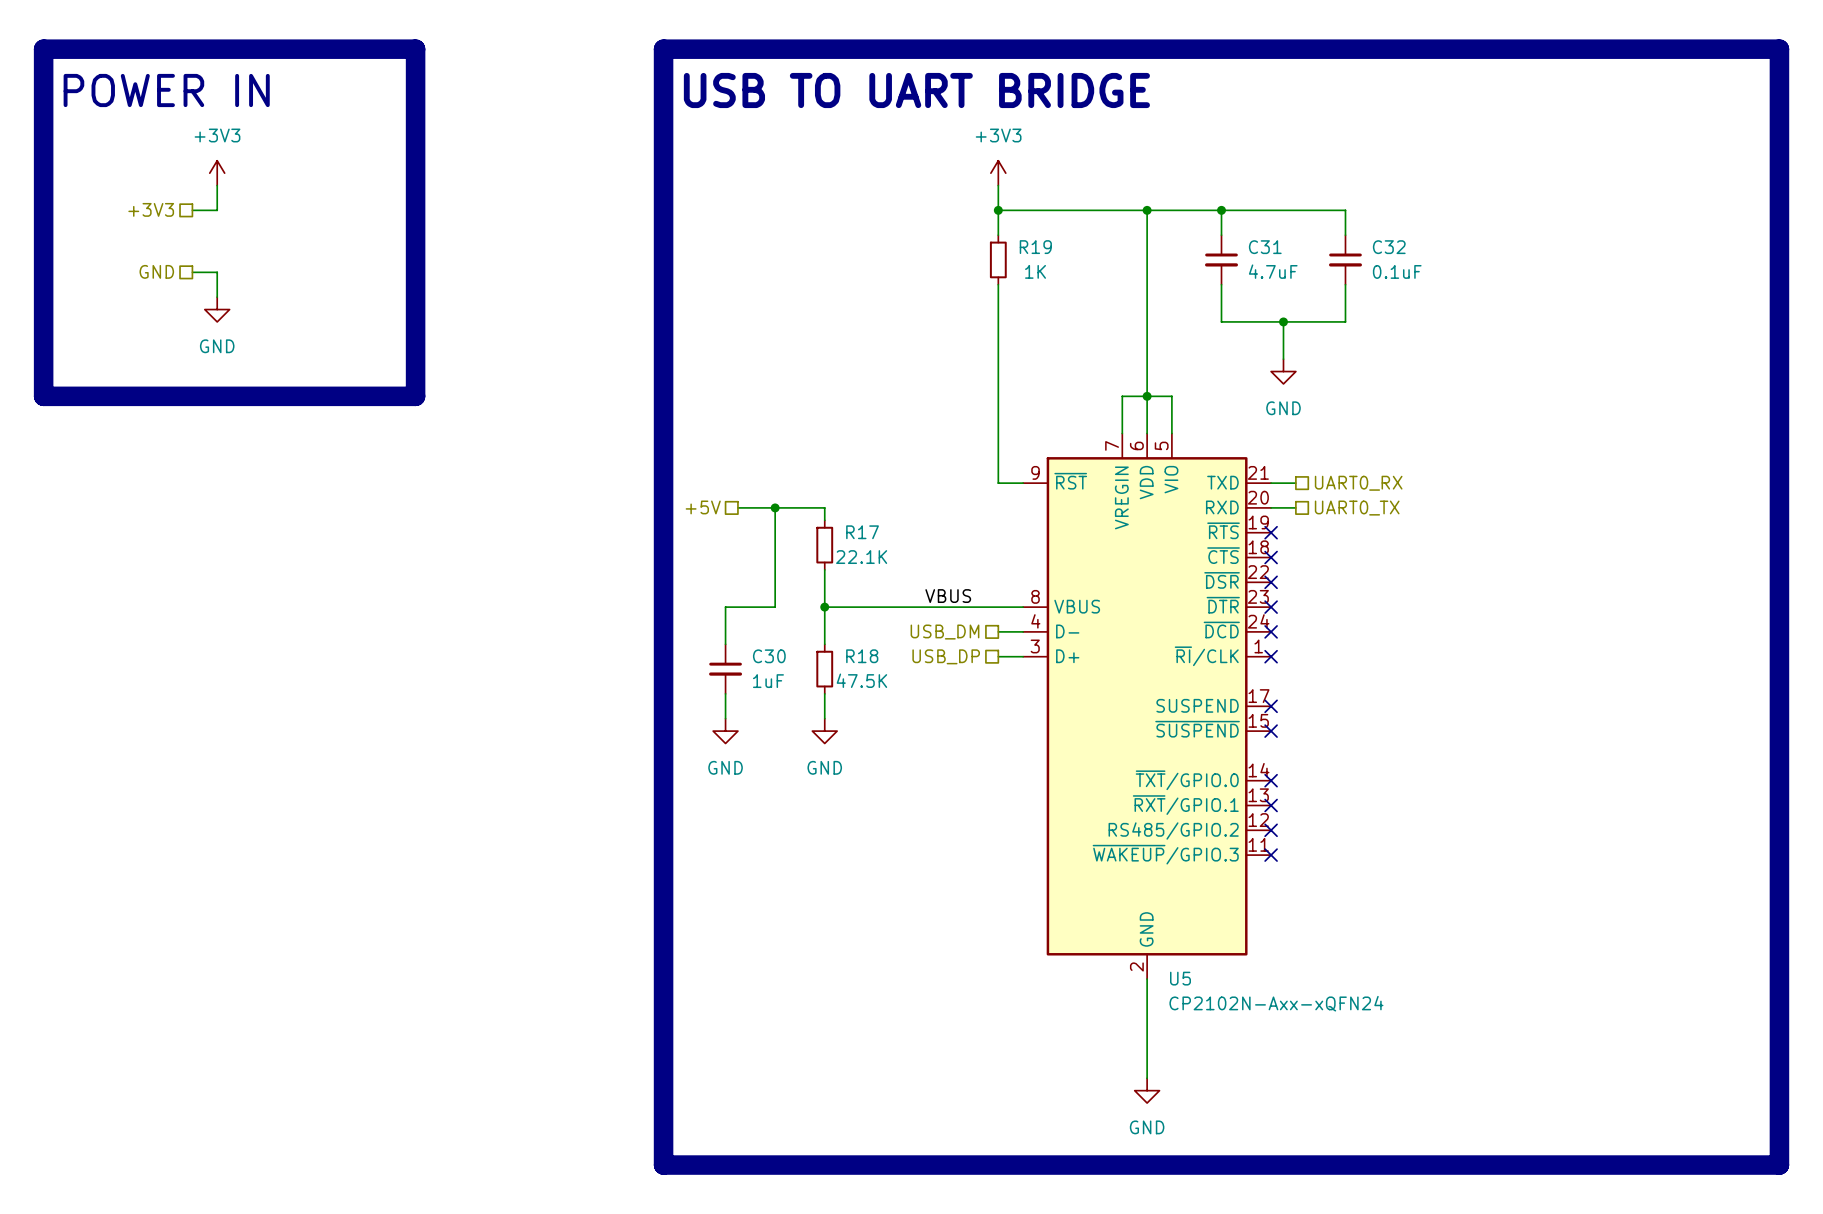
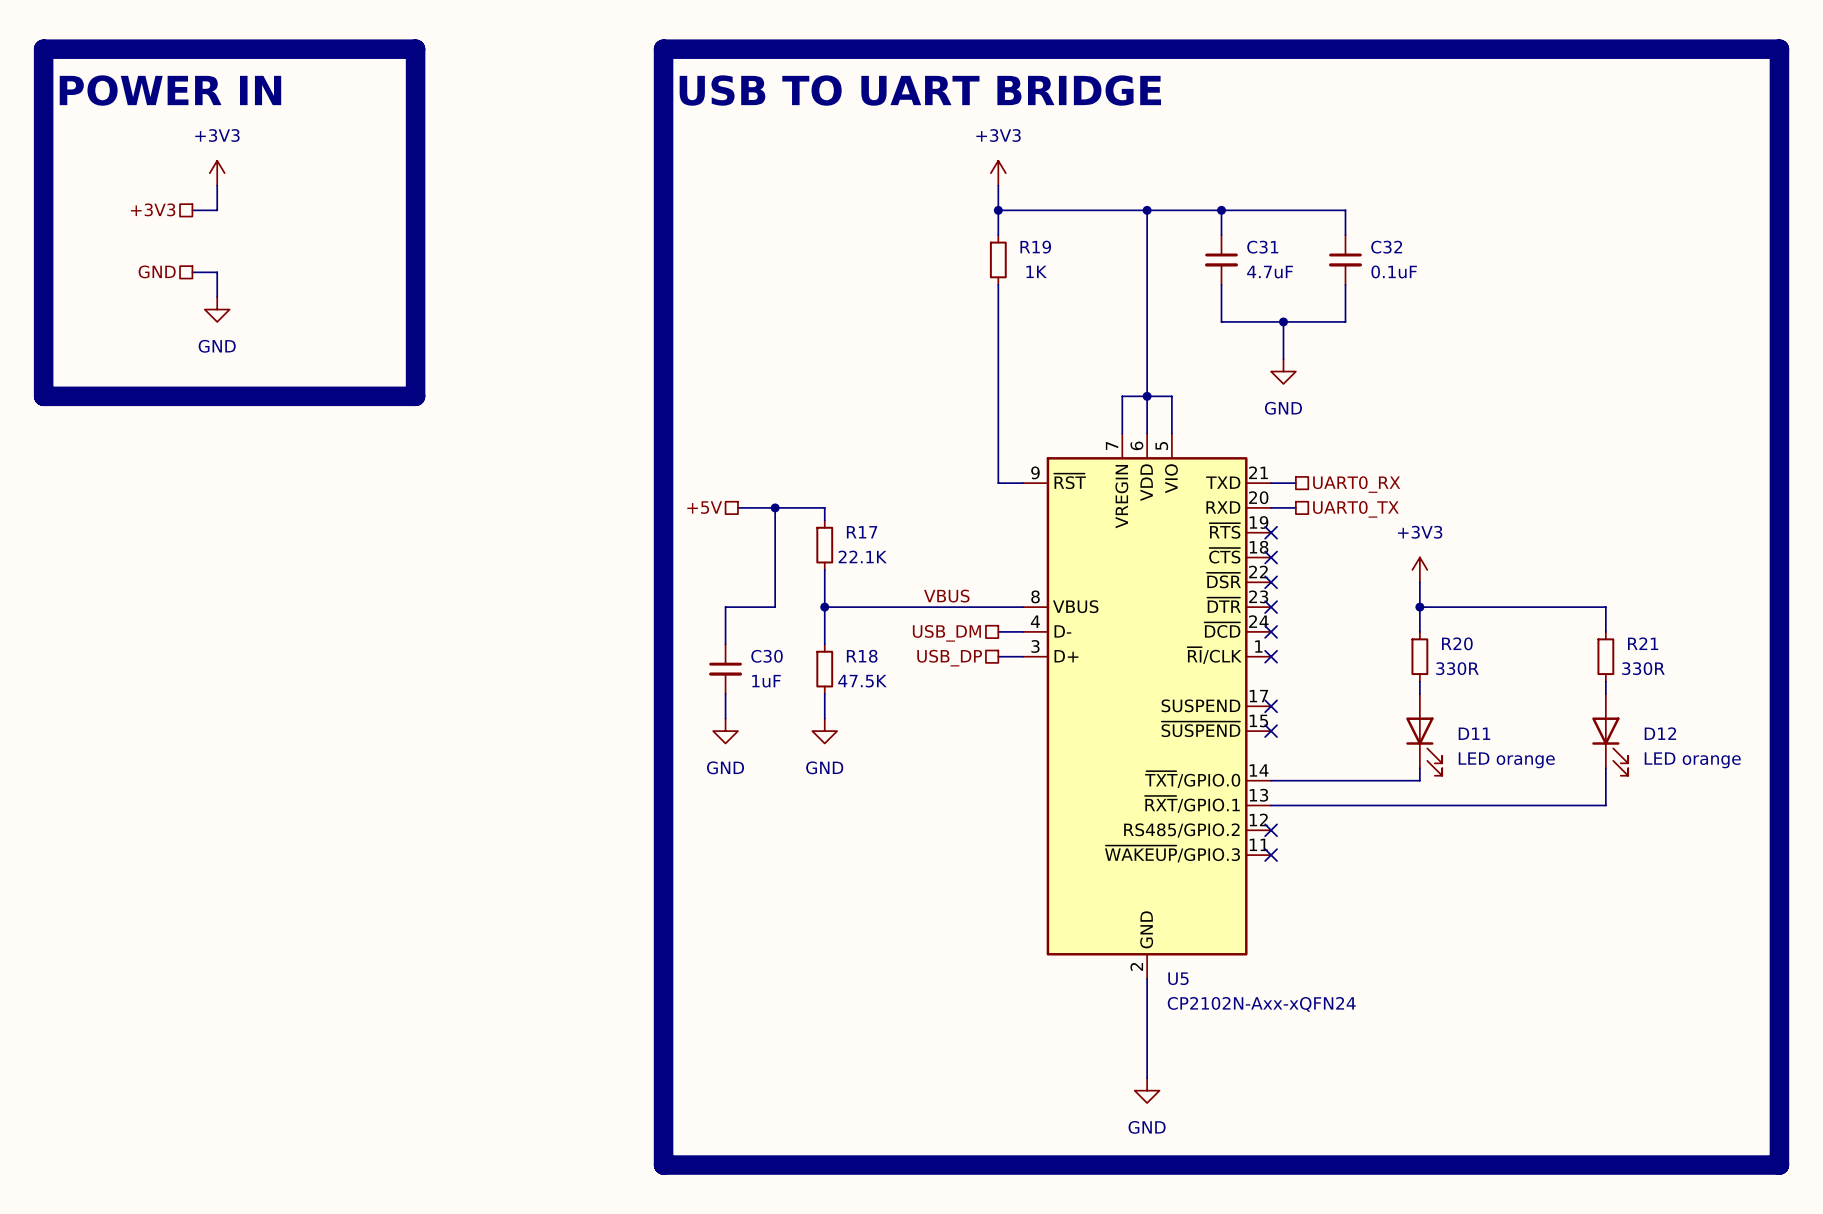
power symbol: none -> +3V3 (1419, 569)
wire: none -> (1419, 582) (1419, 631)
wire: none -> (1419, 607) (1605, 607) (1605, 631)
junction: none -> (1419, 607)
R20: none -> 330R (1419, 656)
R21: none -> 330R (1605, 656)
wire: none -> (1419, 681) (1419, 693)
wire: none -> (1605, 681) (1605, 693)
D11: none -> LED orange (1424, 734)
D12: none -> LED orange (1610, 734)
wire: none -> (1419, 768) (1419, 780) (1271, 780)
wire: none -> (1605, 768) (1605, 805) (1271, 805)
no-connect mark: (1271, 780) -> none
no-connect mark: (1271, 805) -> none

